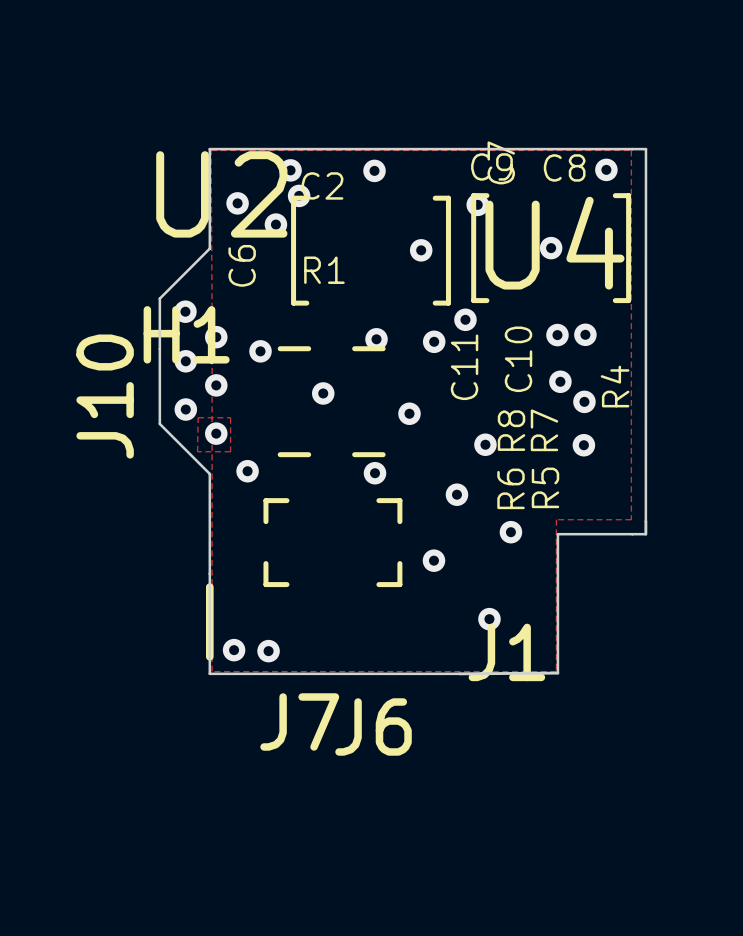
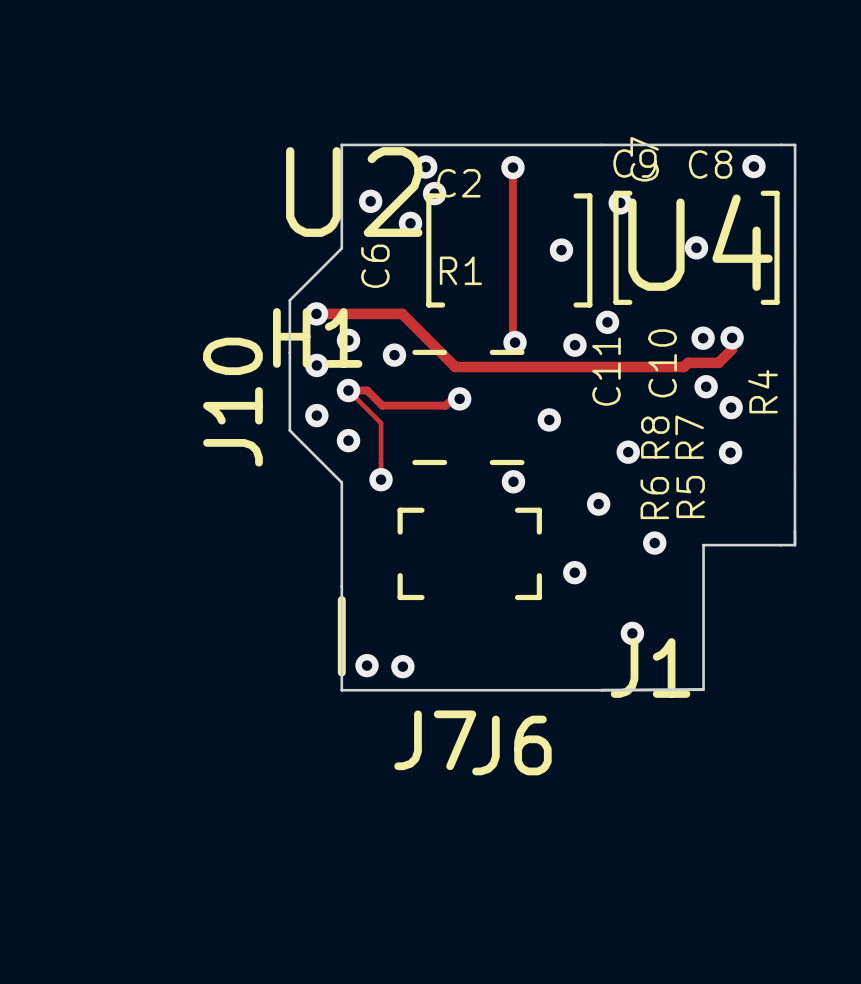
zone outline: (211, 150) (631, 150) (631, 519) (556, 519) (556, 671) (212, 671) (211, 150) -> none
track: none -> (512, 167) (512, 340) (515, 342)
track: none -> (316, 313) (402, 313) (455, 367) (683, 367) (687, 362) (718, 362) (732, 349) (732, 337)
track: none -> (459, 398) (452, 398) (445, 405) (382, 405) (367, 390) (348, 390) (381, 423) (381, 479)
zone outline: (198, 417) (230, 417) (230, 451) (197, 451) (198, 417) -> none

